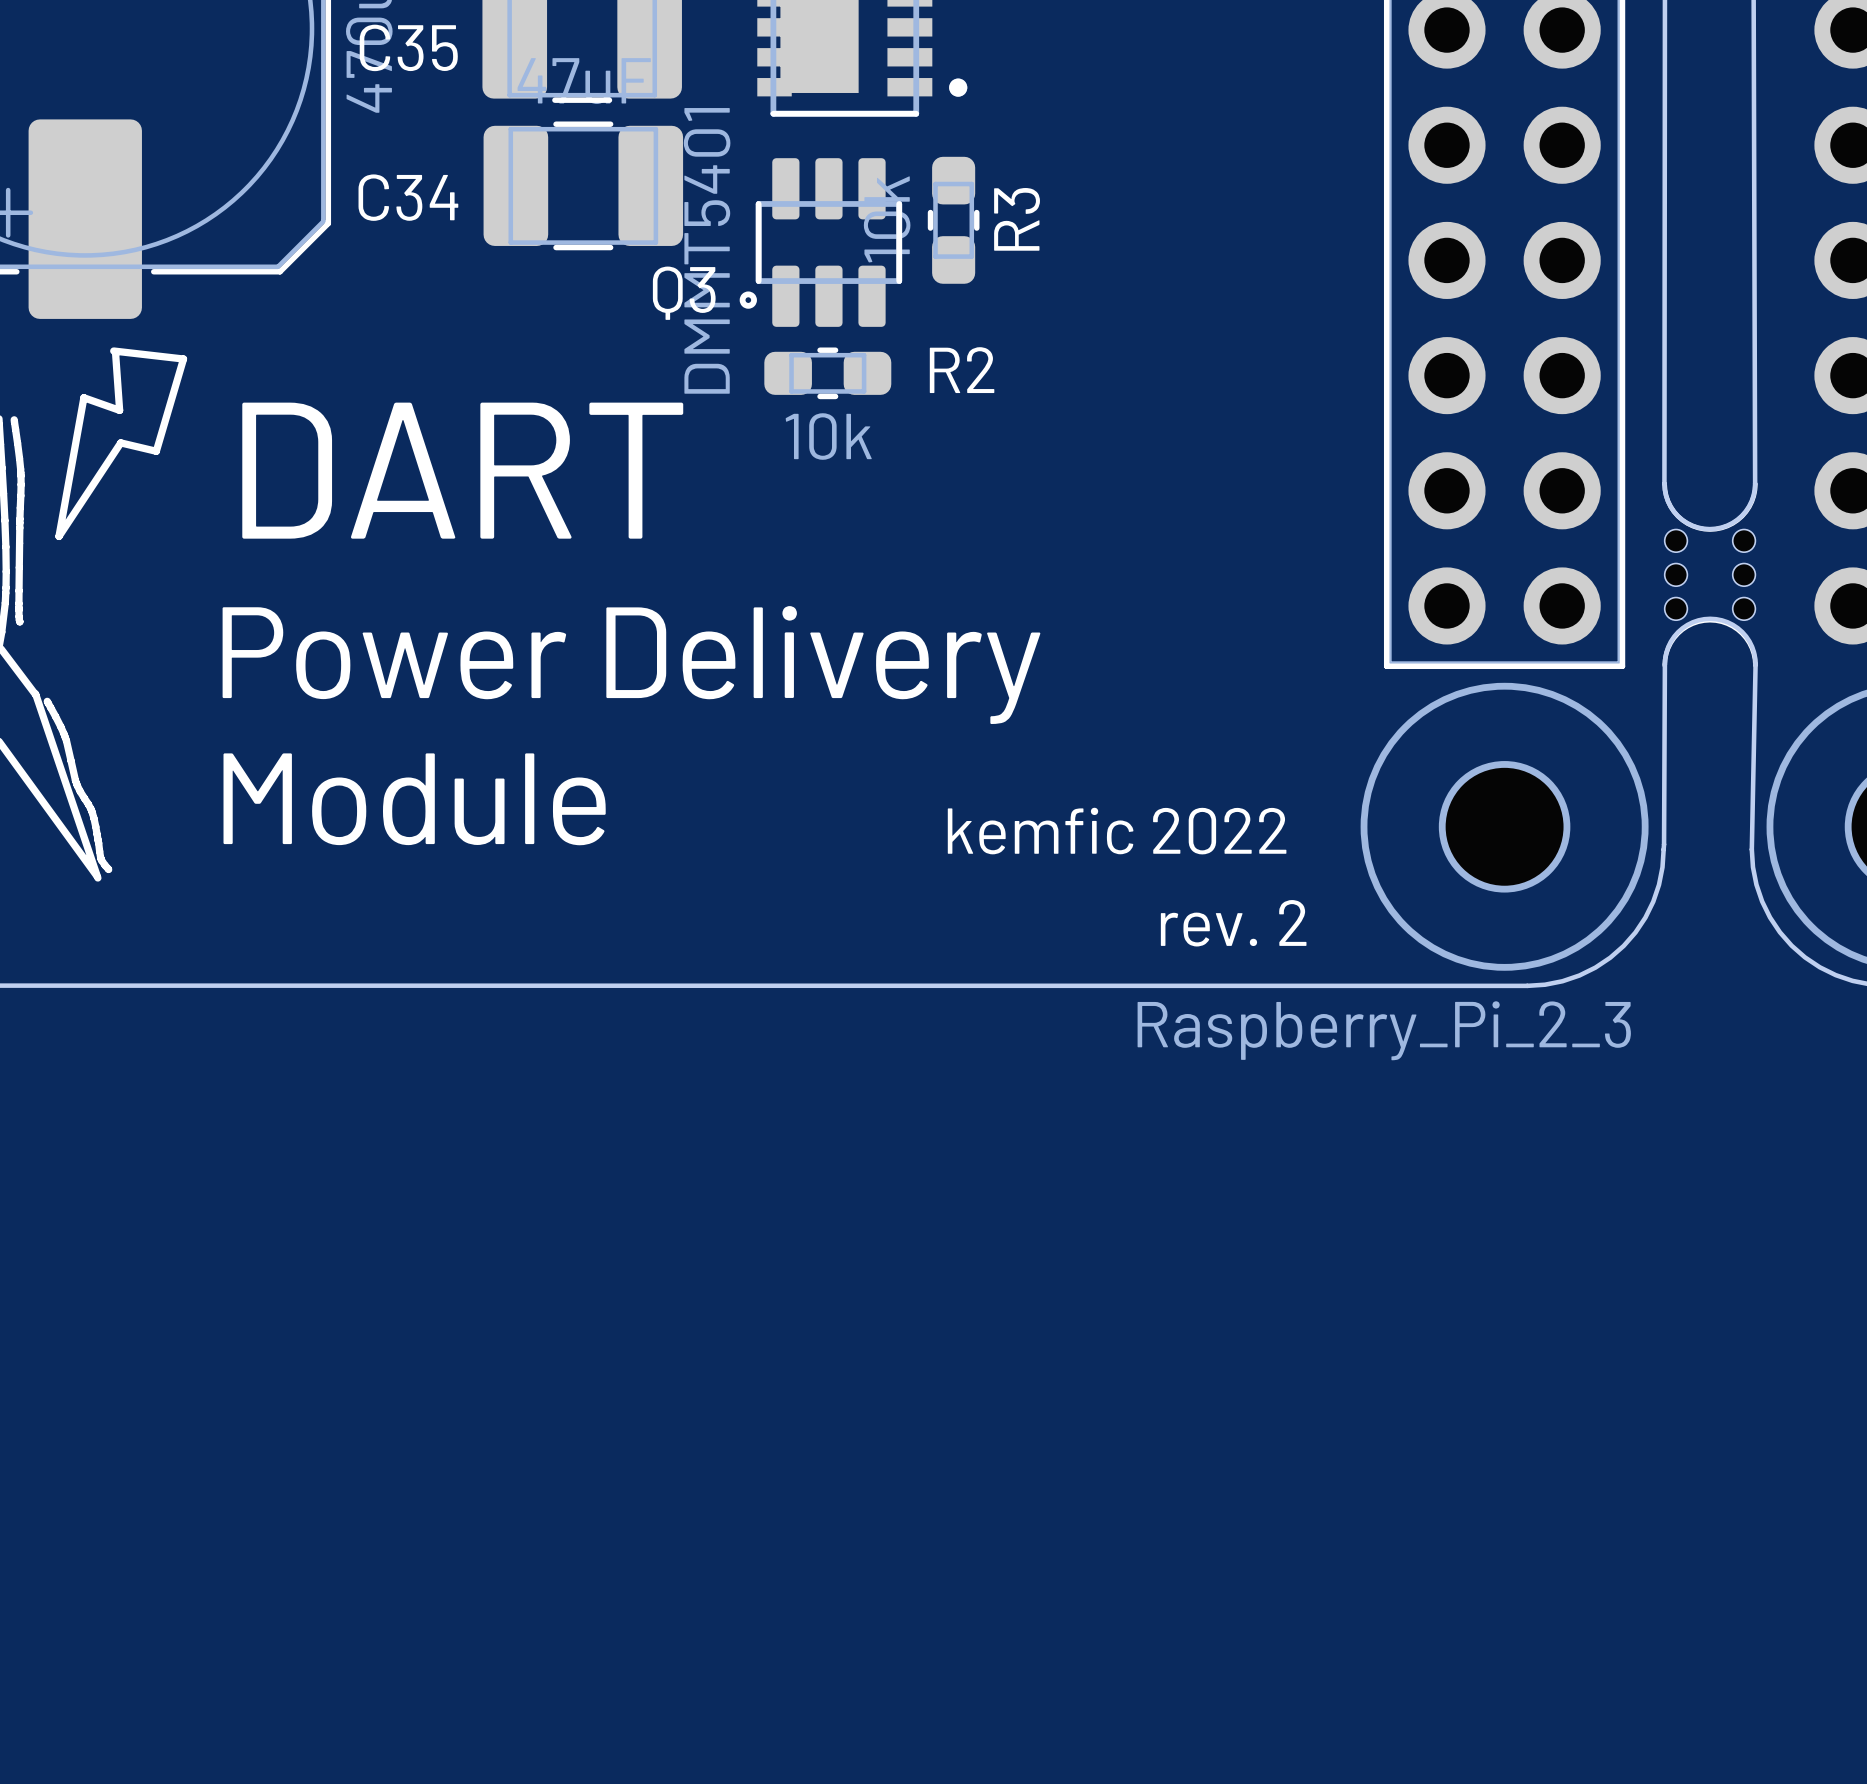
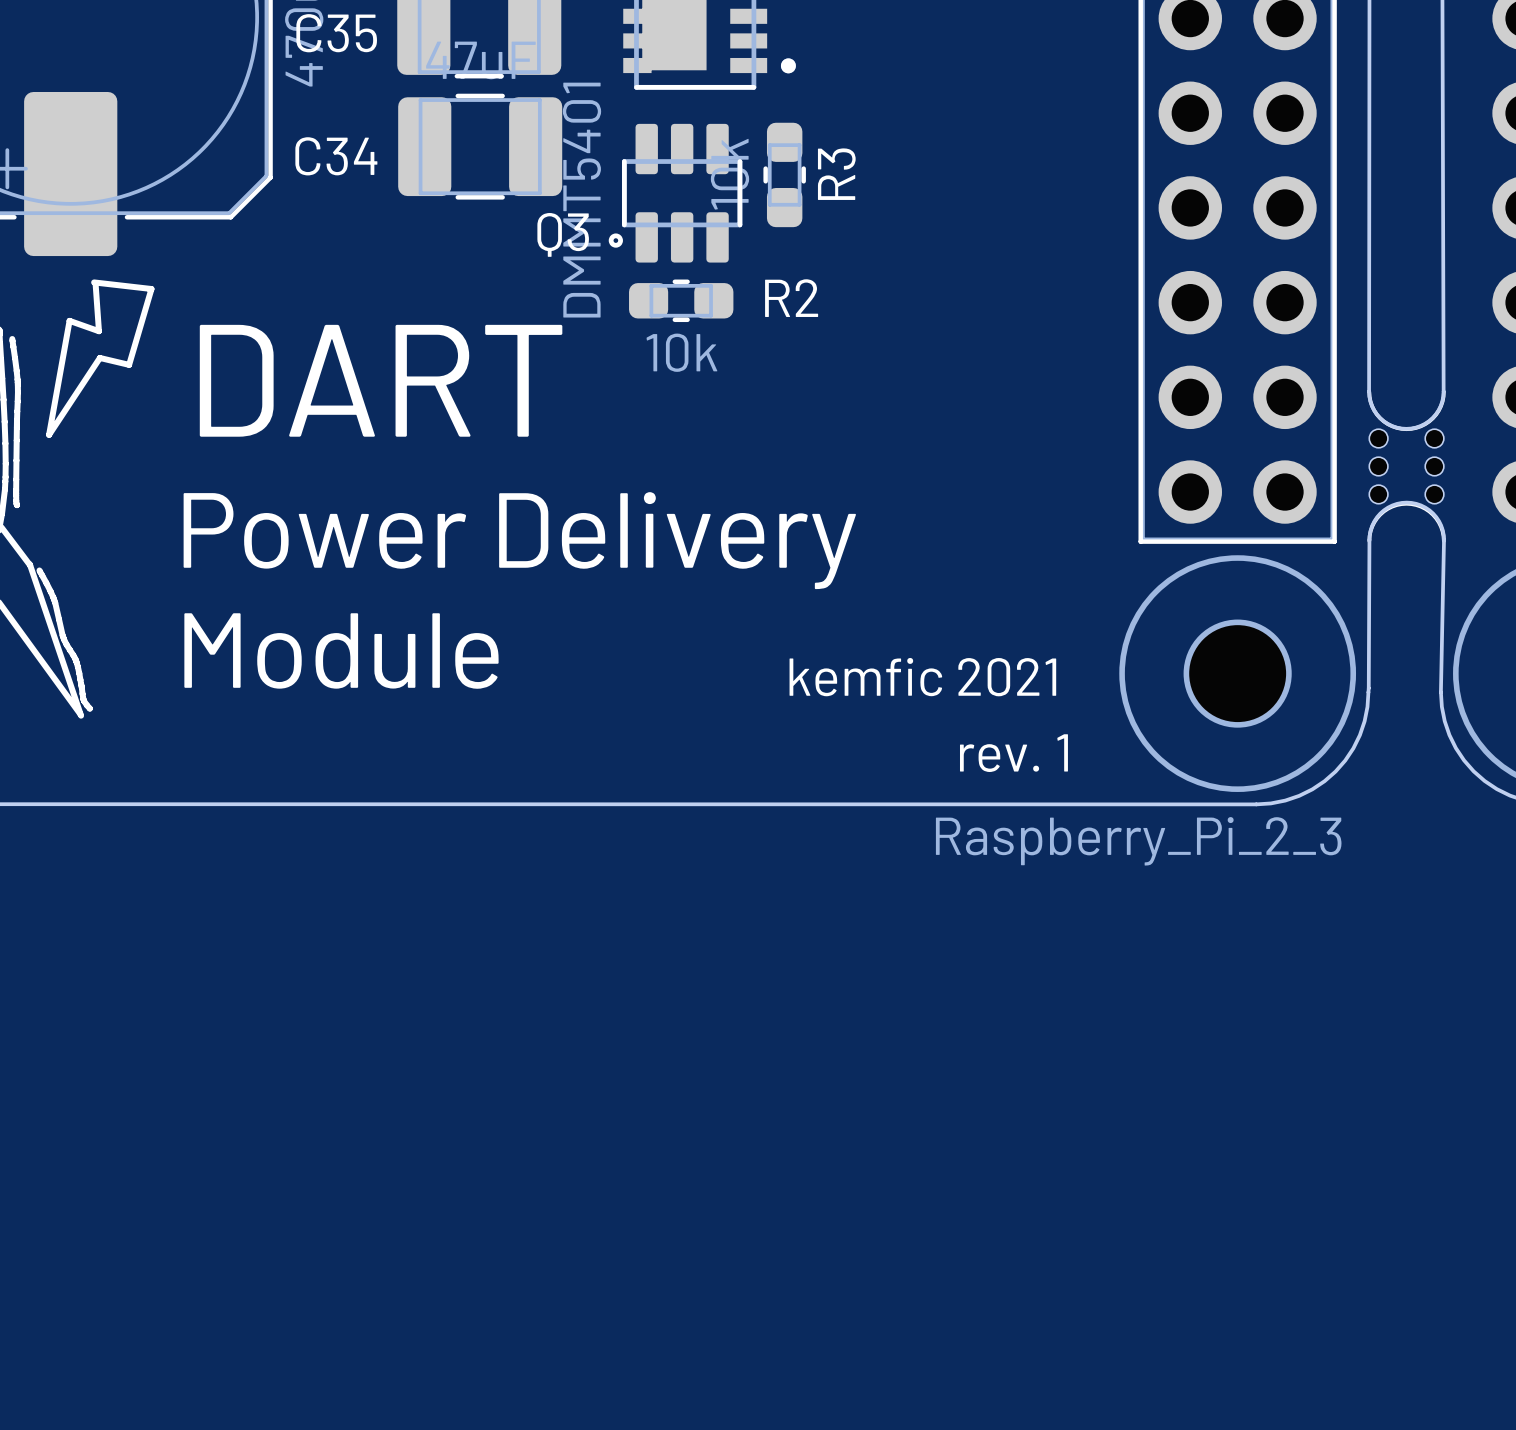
text: kemfic 2022 (1117, 831) -> kemfic 2021 (922, 677)
text: rev. 2 (1233, 923) -> rev. 1 (1013, 753)

